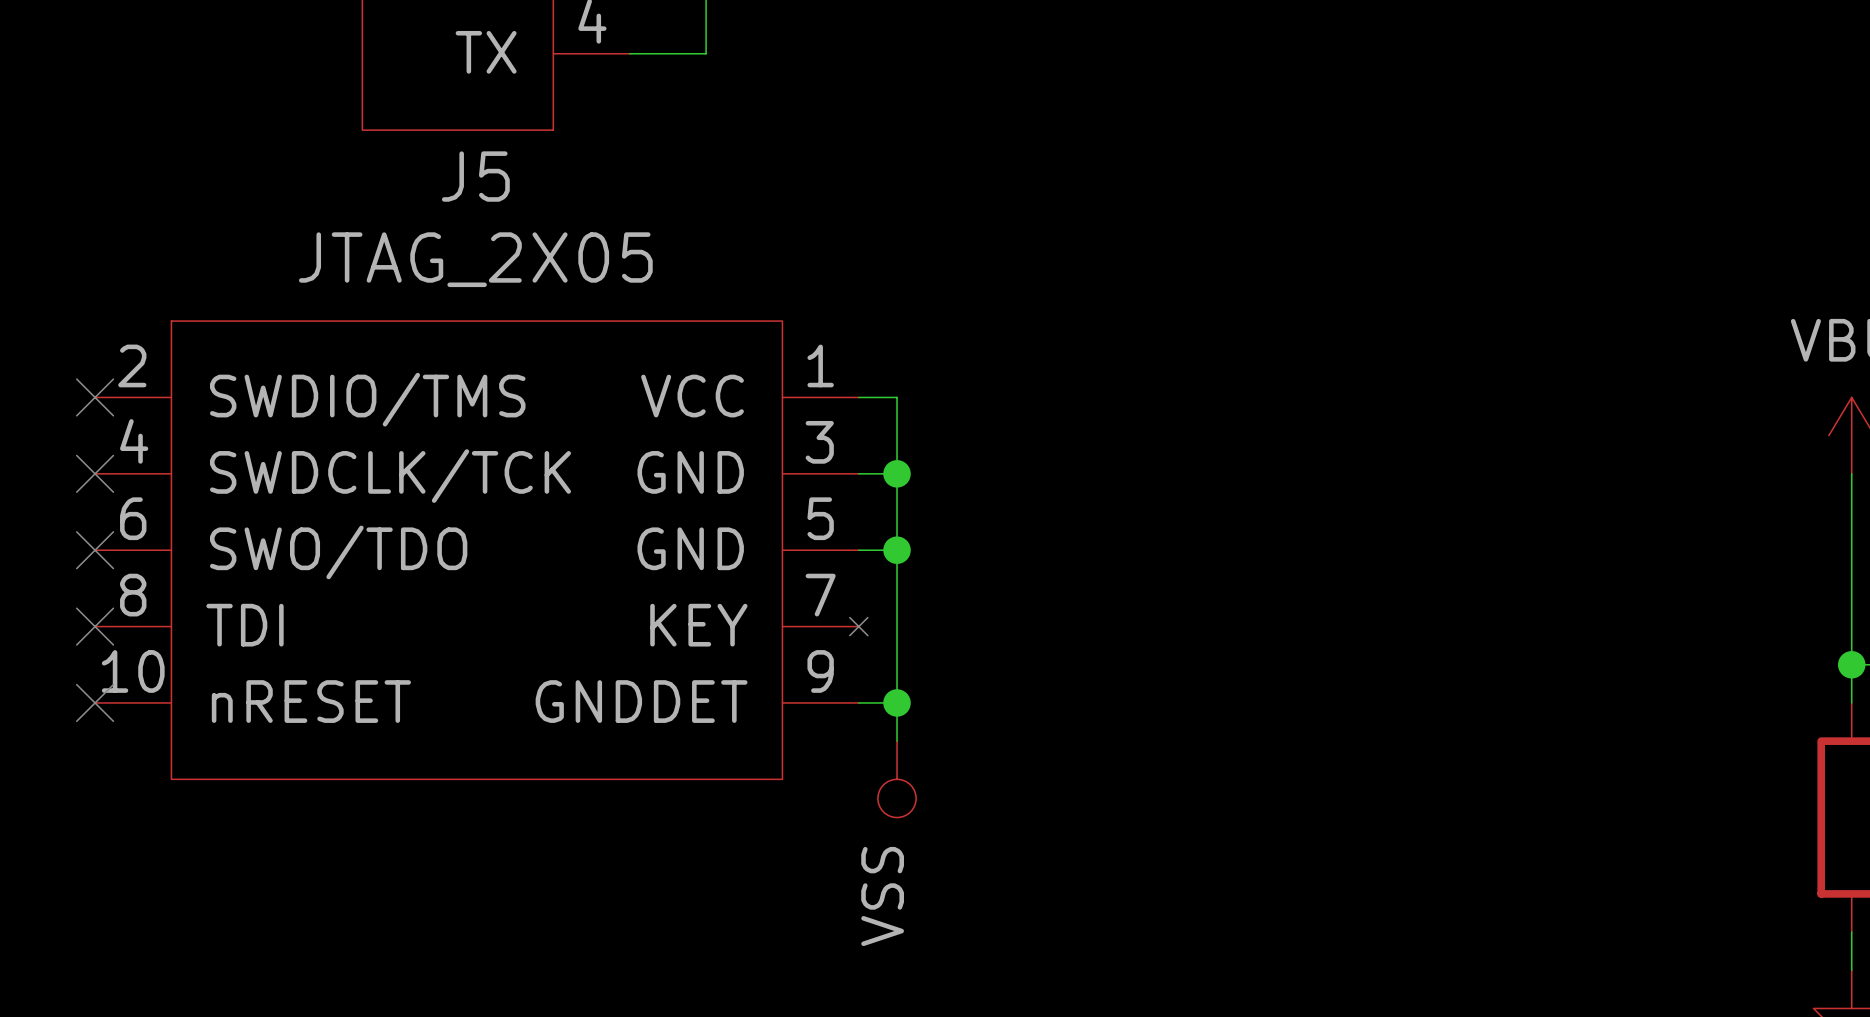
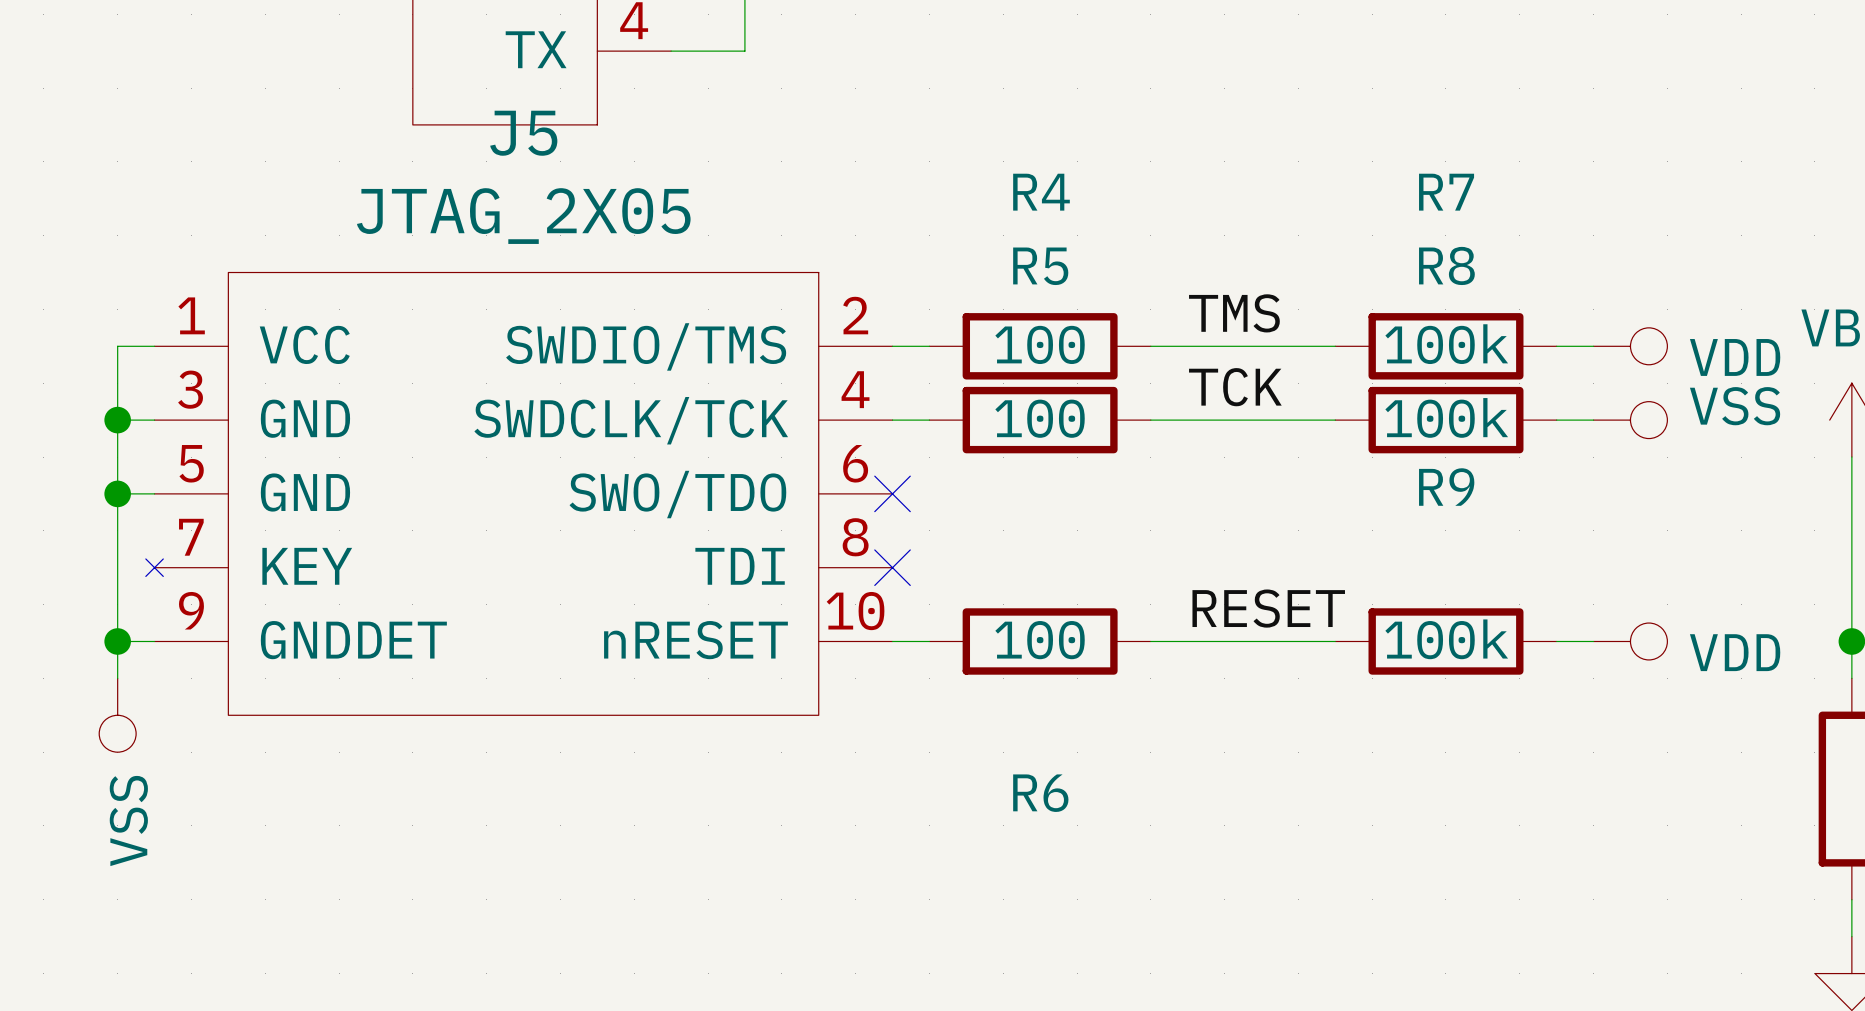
label: none -> TMS (1234, 313)
wire: none -> (154, 346) (117, 346) (117, 678)
wire: none -> (892, 346) (929, 346)
R4: none -> 100 (1040, 346)
wire: none -> (1150, 346) (1335, 346)
R7: none -> 100k (1445, 346)
wire: none -> (1556, 346) (1593, 346)
power symbol: none -> VDD (1630, 346)
no-connect mark: (95, 397) -> none
wire: (858, 397) (897, 397) (897, 741) -> none
label: none -> TCK (1235, 387)
wire: none -> (117, 420) (154, 420)
junction: none -> (117, 420)
R5: none -> 100 (1040, 420)
wire: none -> (1150, 420) (1335, 420)
R8: none -> 100k (1445, 420)
power symbol: none -> VSS (1630, 420)
no-connect mark: (95, 473) -> none
wire: (858, 473) (897, 473) -> (892, 420) (929, 420)
junction: (897, 473) -> none
wire: none -> (117, 493) (154, 493)
junction: none -> (117, 493)
no-connect mark: none -> (892, 493)
no-connect mark: (95, 550) -> none
J5 flip: as is (519, 550) -> left-right (482, 493)
wire: (858, 550) (897, 550) -> (1556, 420) (1593, 420)
junction: (897, 550) -> none
no-connect mark: none -> (892, 567)
no-connect mark: (95, 626) -> none
label: none -> RESET (1268, 608)
wire: none -> (117, 641) (154, 641)
junction: none -> (117, 641)
R6: none -> 100 (1040, 641)
wire: none -> (1150, 641) (1335, 641)
R9: none -> 100k (1445, 641)
wire: none -> (1556, 641) (1593, 641)
power symbol: none -> VDD (1630, 641)
no-connect mark: (95, 702) -> none
wire: (858, 702) (897, 702) -> (892, 641) (929, 641)
junction: (897, 702) -> none
power symbol: none -> VSS (117, 715)
power symbol: VSS (897, 779) -> none

